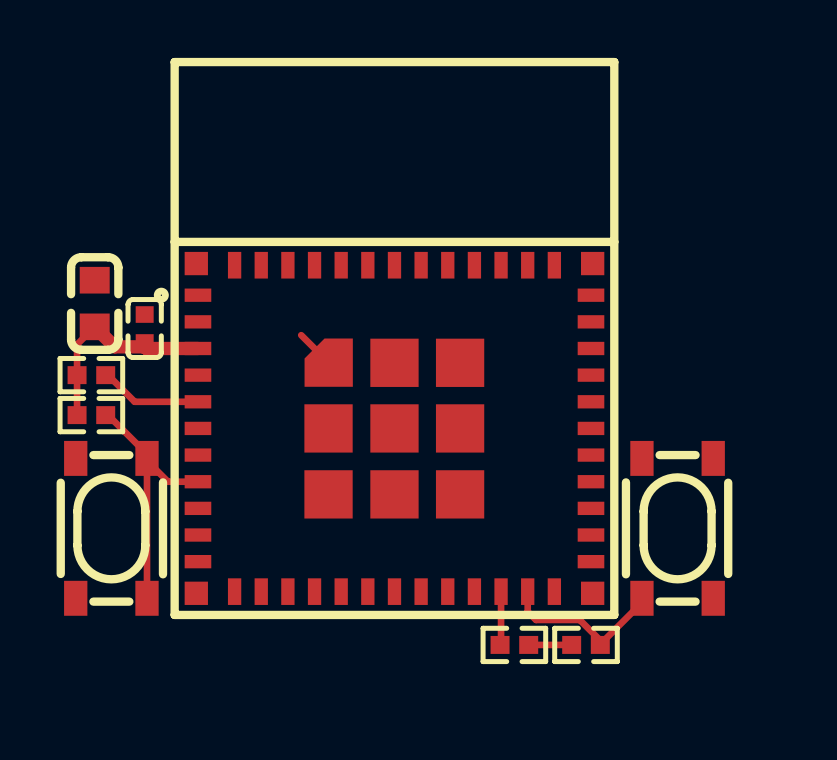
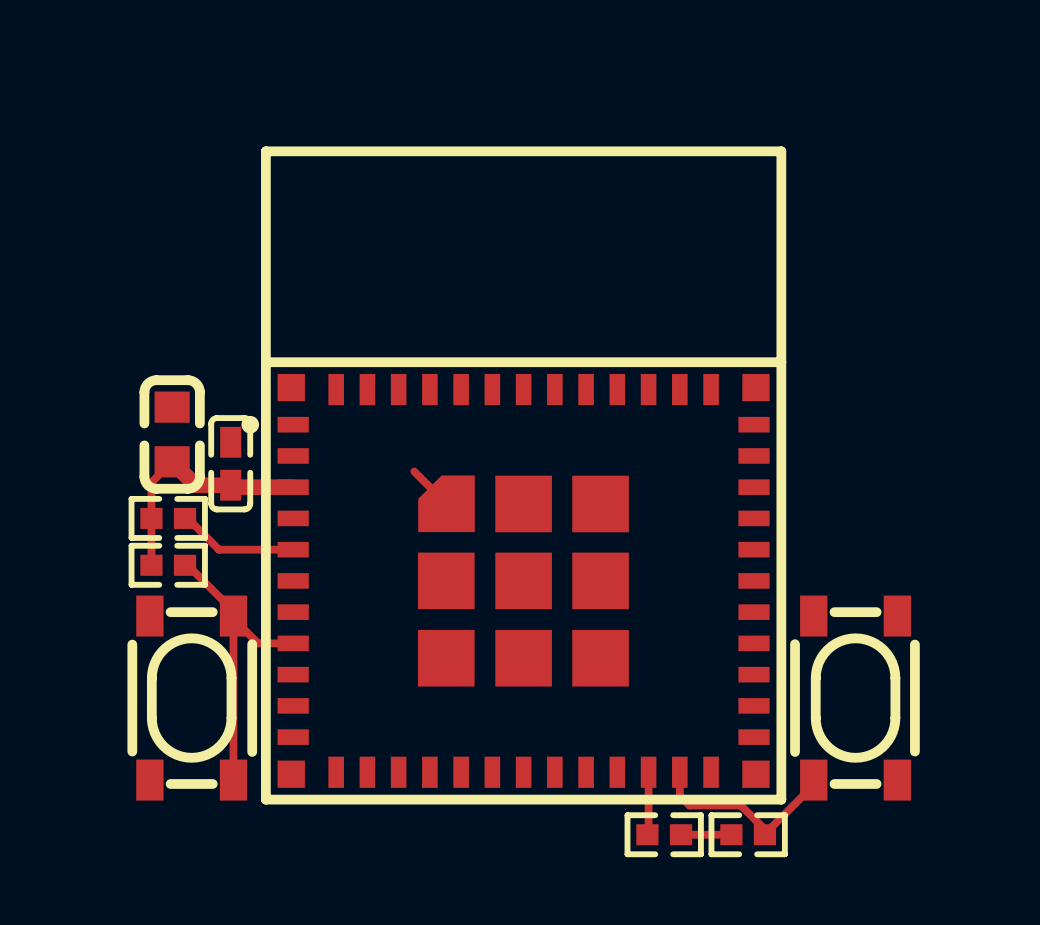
part footprint: [125, 297, 164, 360] -> [208, 415, 254, 513]

